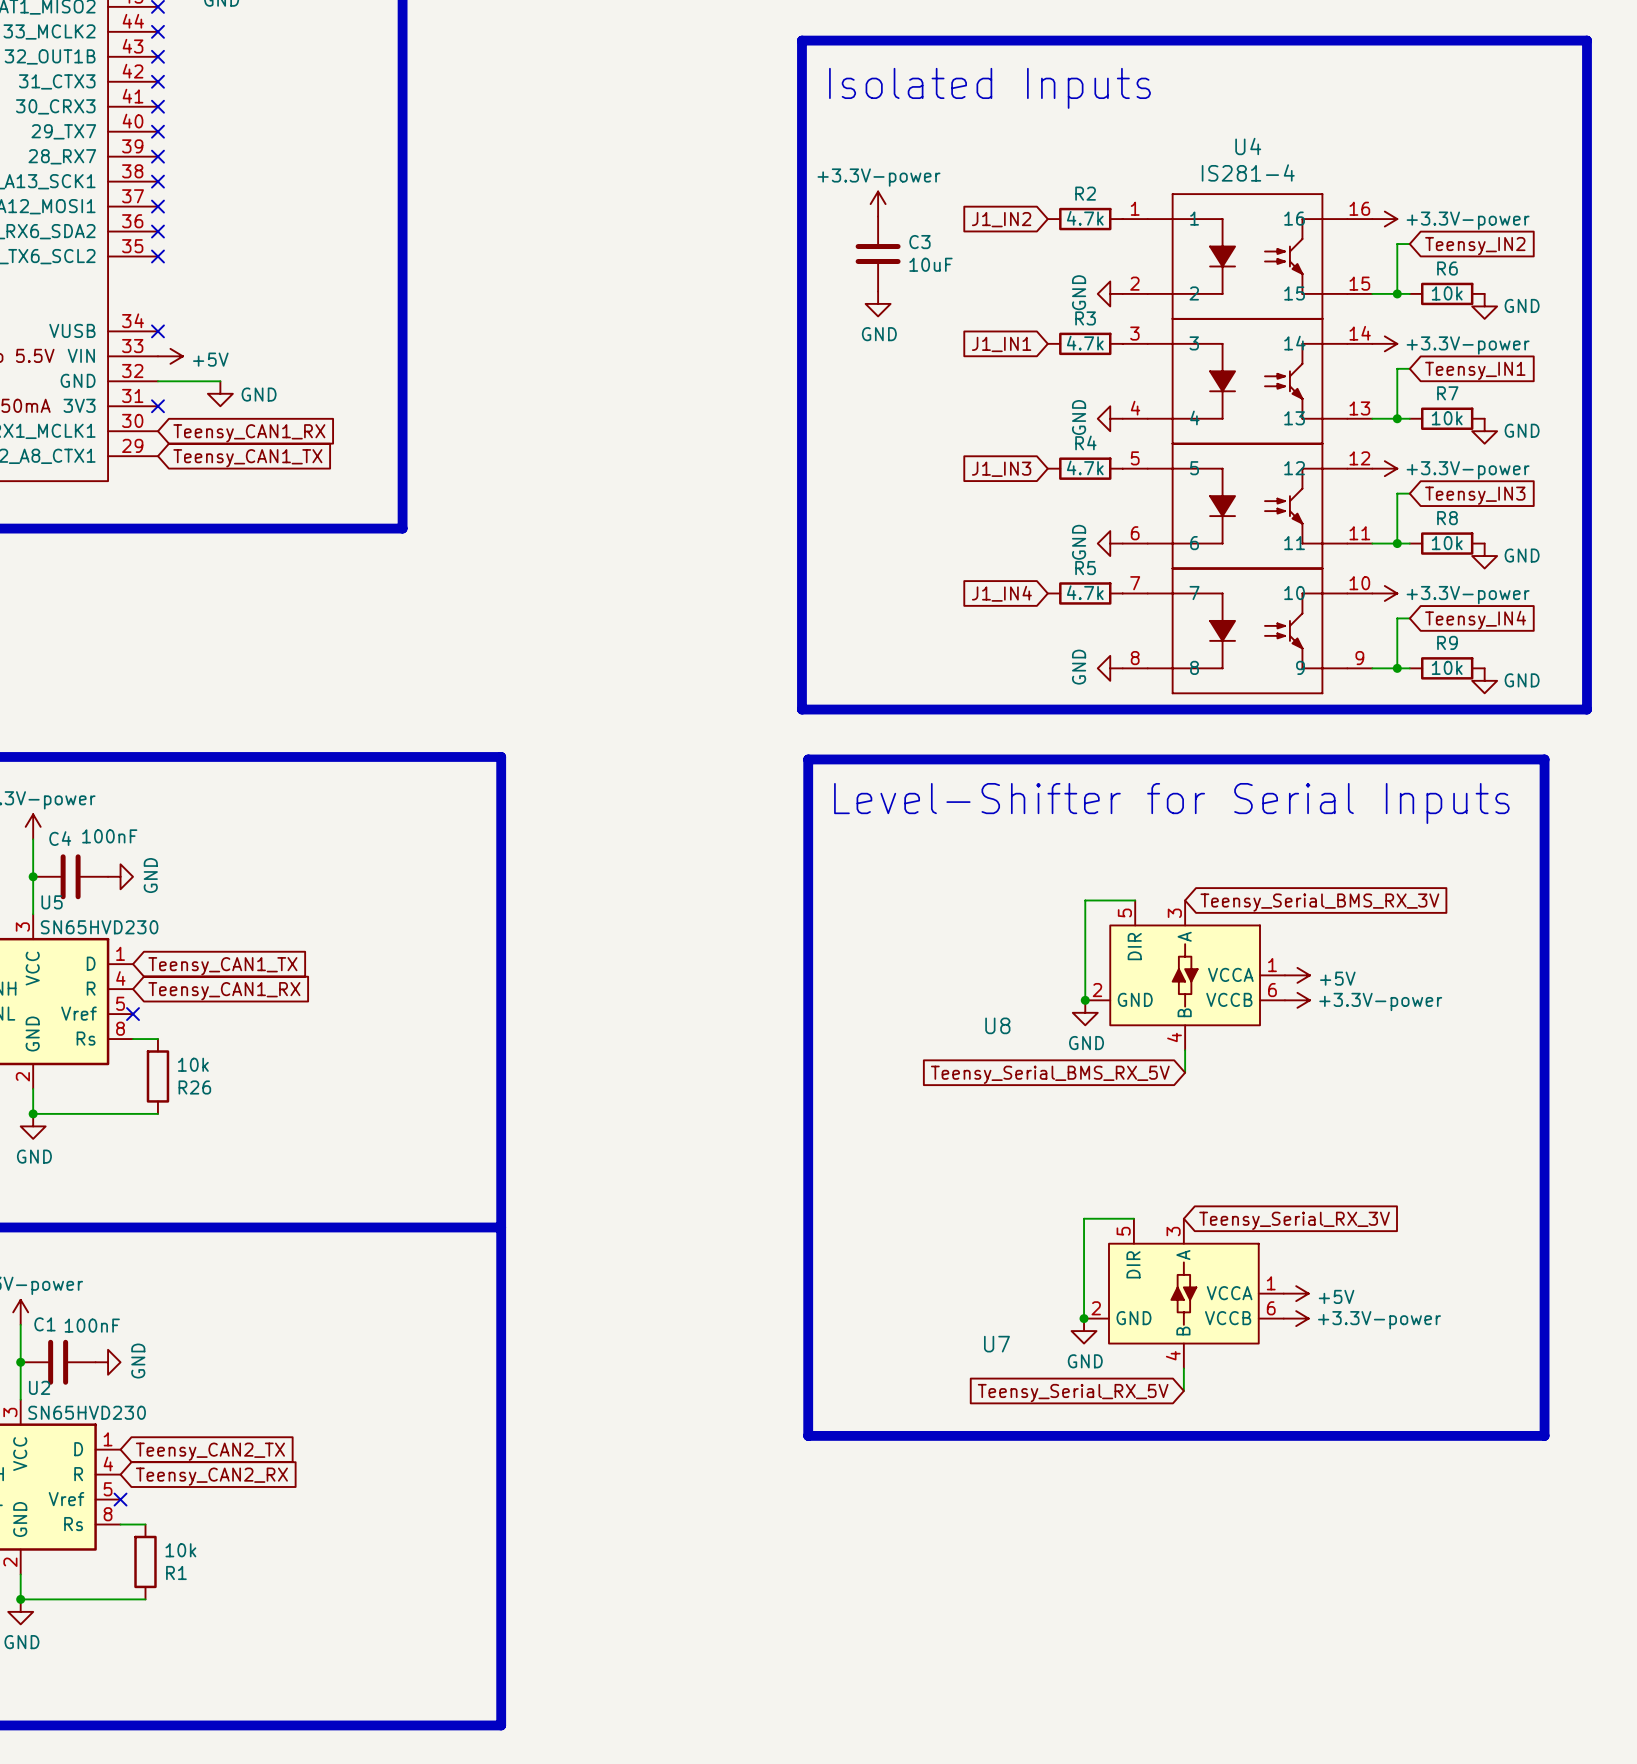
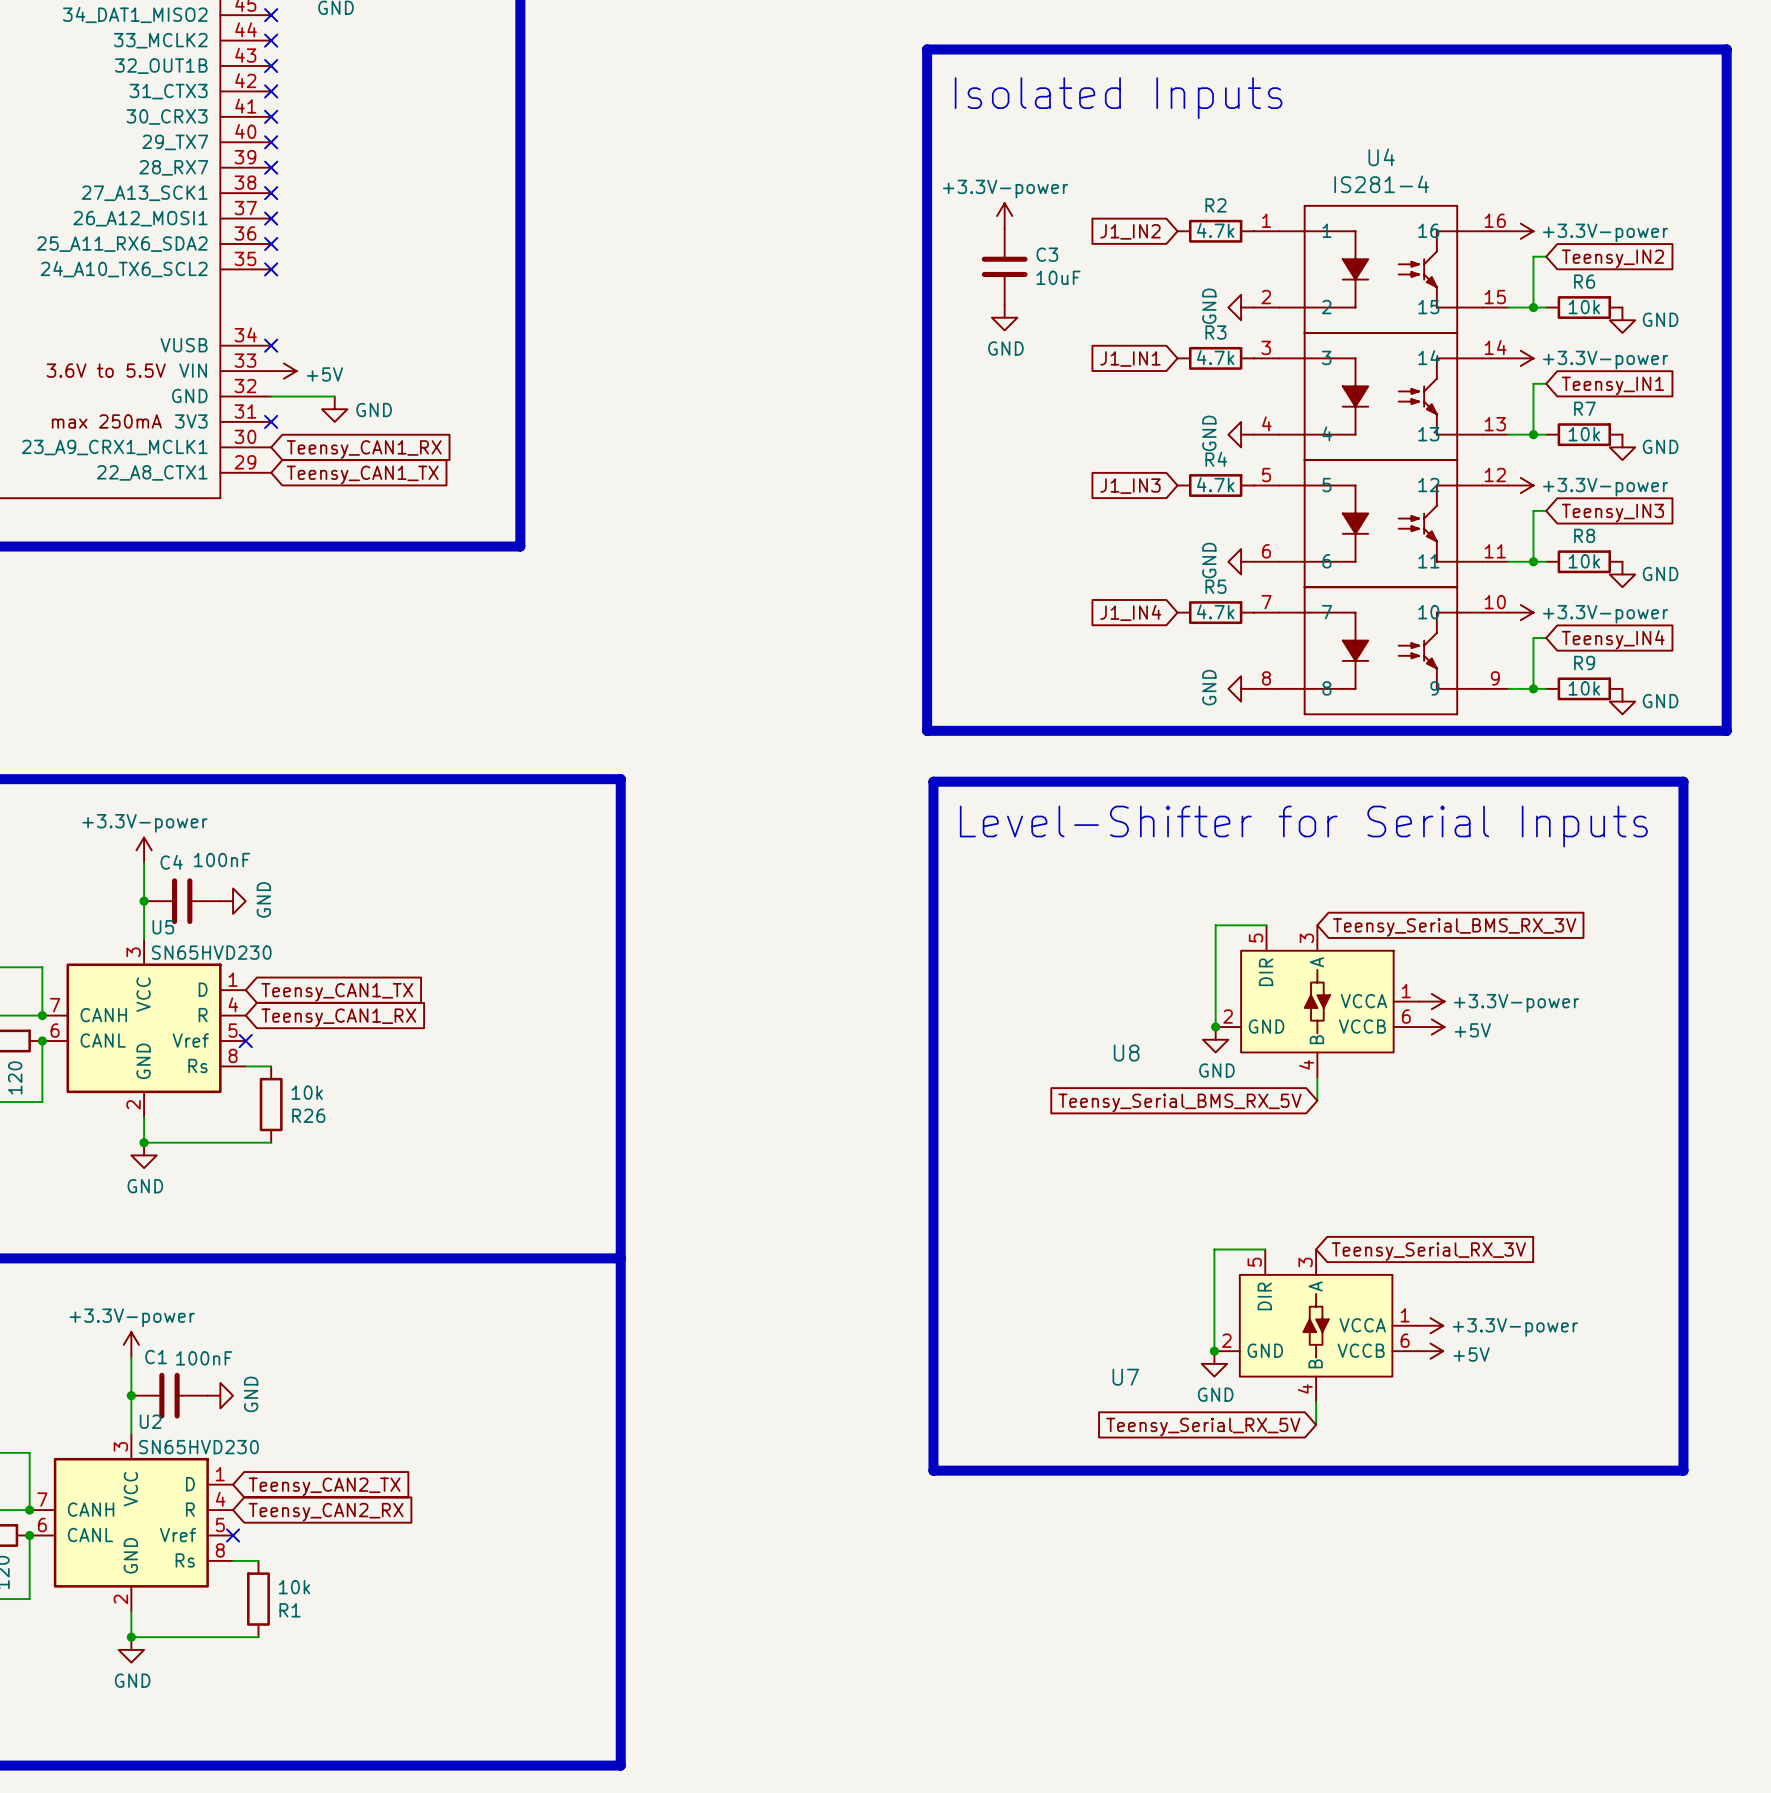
power symbol: +5V (1297, 975) -> +3.3V-power (1431, 1001)
power symbol: +3.3V-power (1297, 1000) -> +5V (1431, 1027)
power symbol: +5V (1296, 1293) -> +3.3V-power (1430, 1325)
power symbol: +3.3V-power (1296, 1318) -> +5V (1430, 1351)

